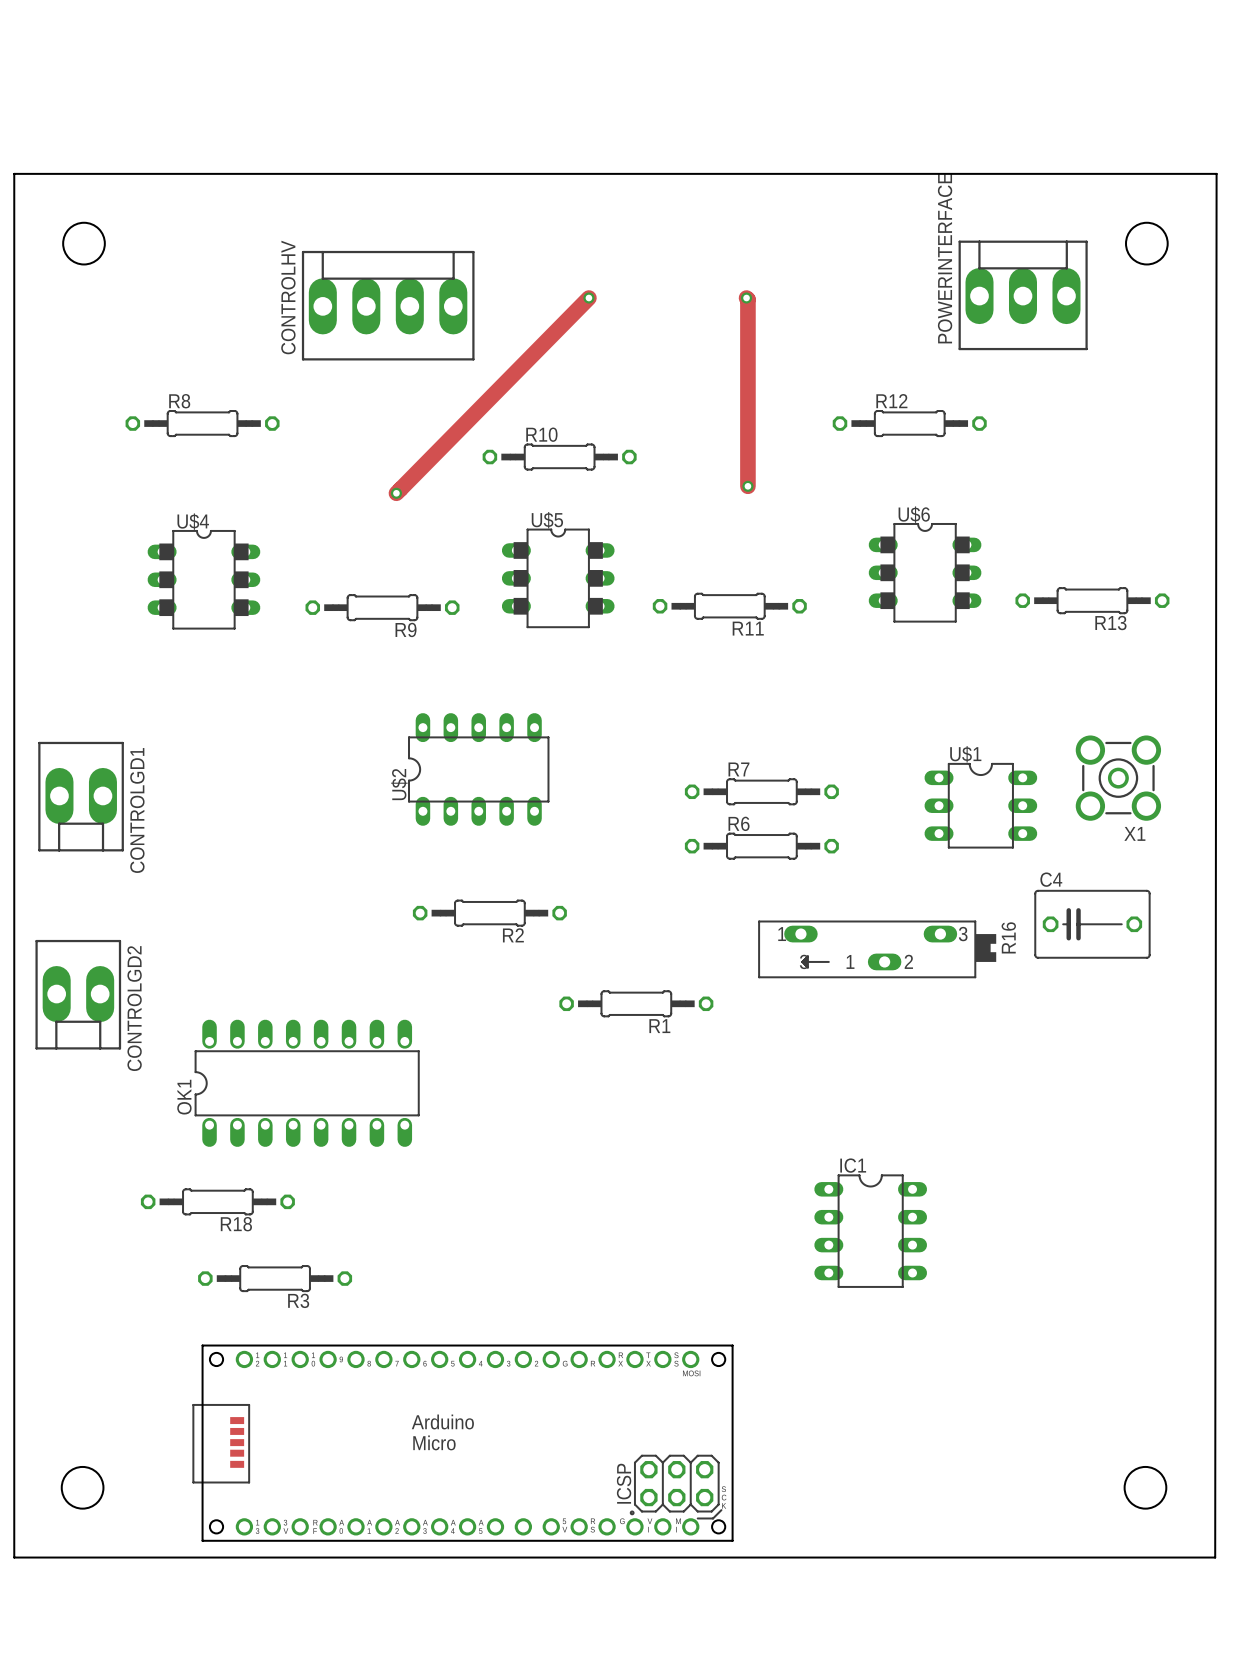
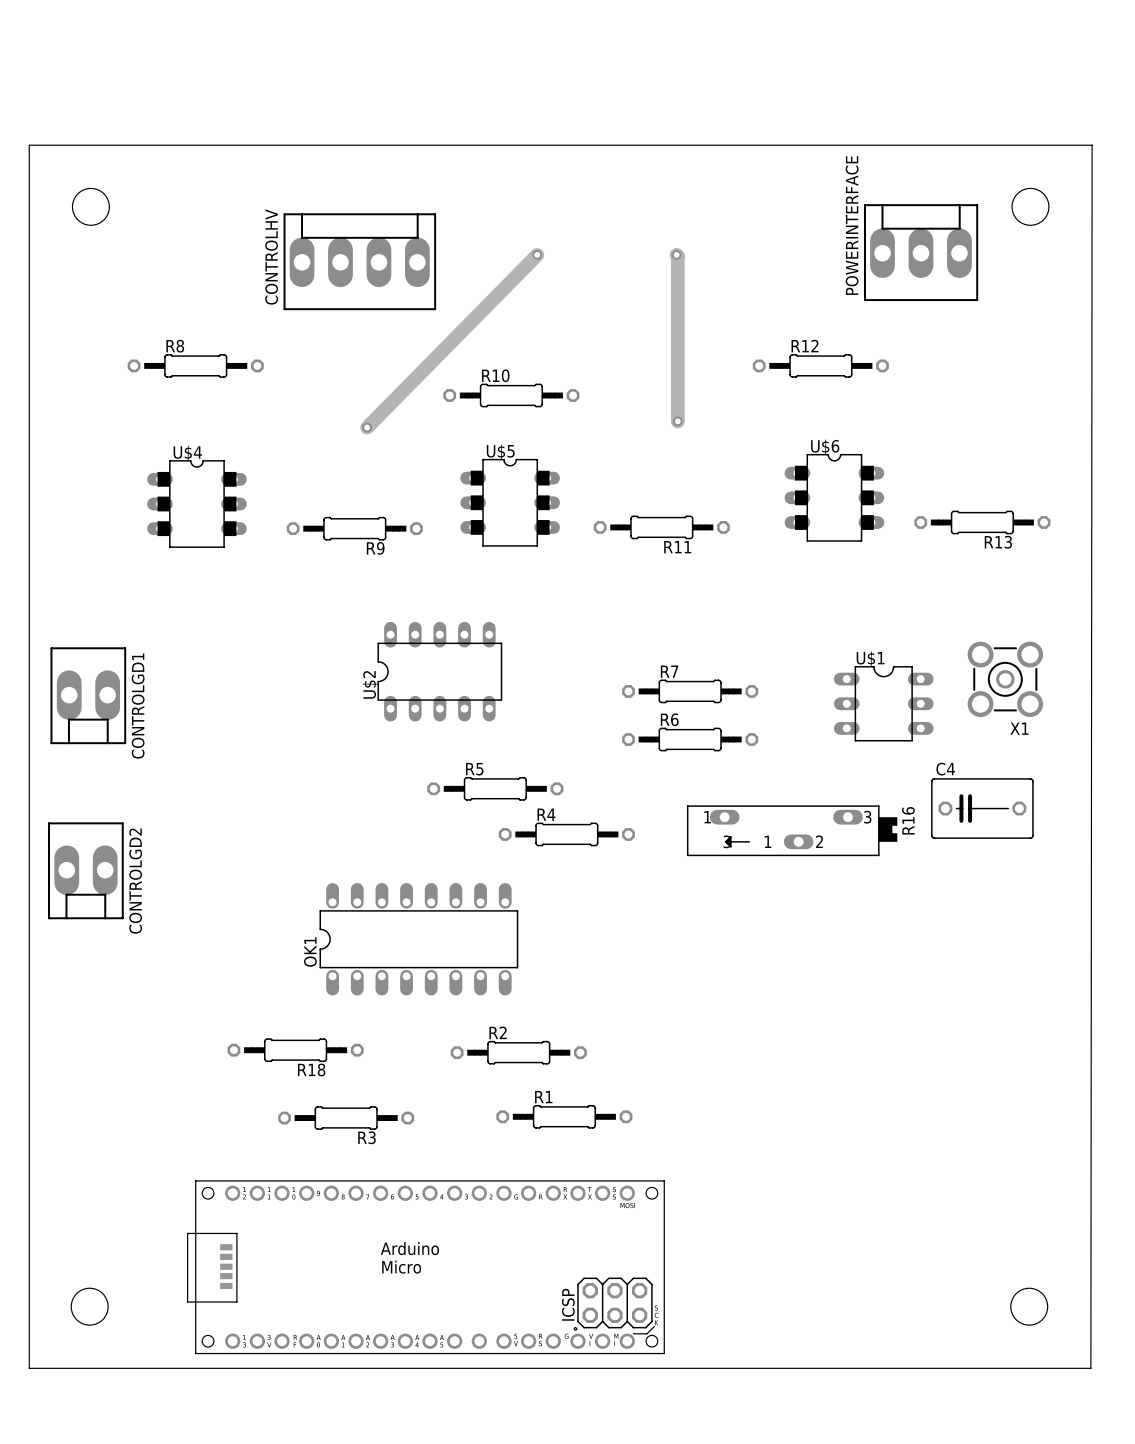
R5: none -> (495, 788)
R2 position: (489, 913) -> (518, 1052)
R2 name position: R2 (513, 935) -> R2 (498, 1032)
R4: none -> (566, 834)
R1 position: (636, 1003) -> (564, 1116)
R1 name position: R1 (659, 1026) -> R1 (543, 1097)
OK1 position: (307, 1083) -> (418, 939)
R18 position: (217, 1201) -> (295, 1050)
IC1: (870, 1231) -> none
R3 position: (275, 1278) -> (346, 1118)

